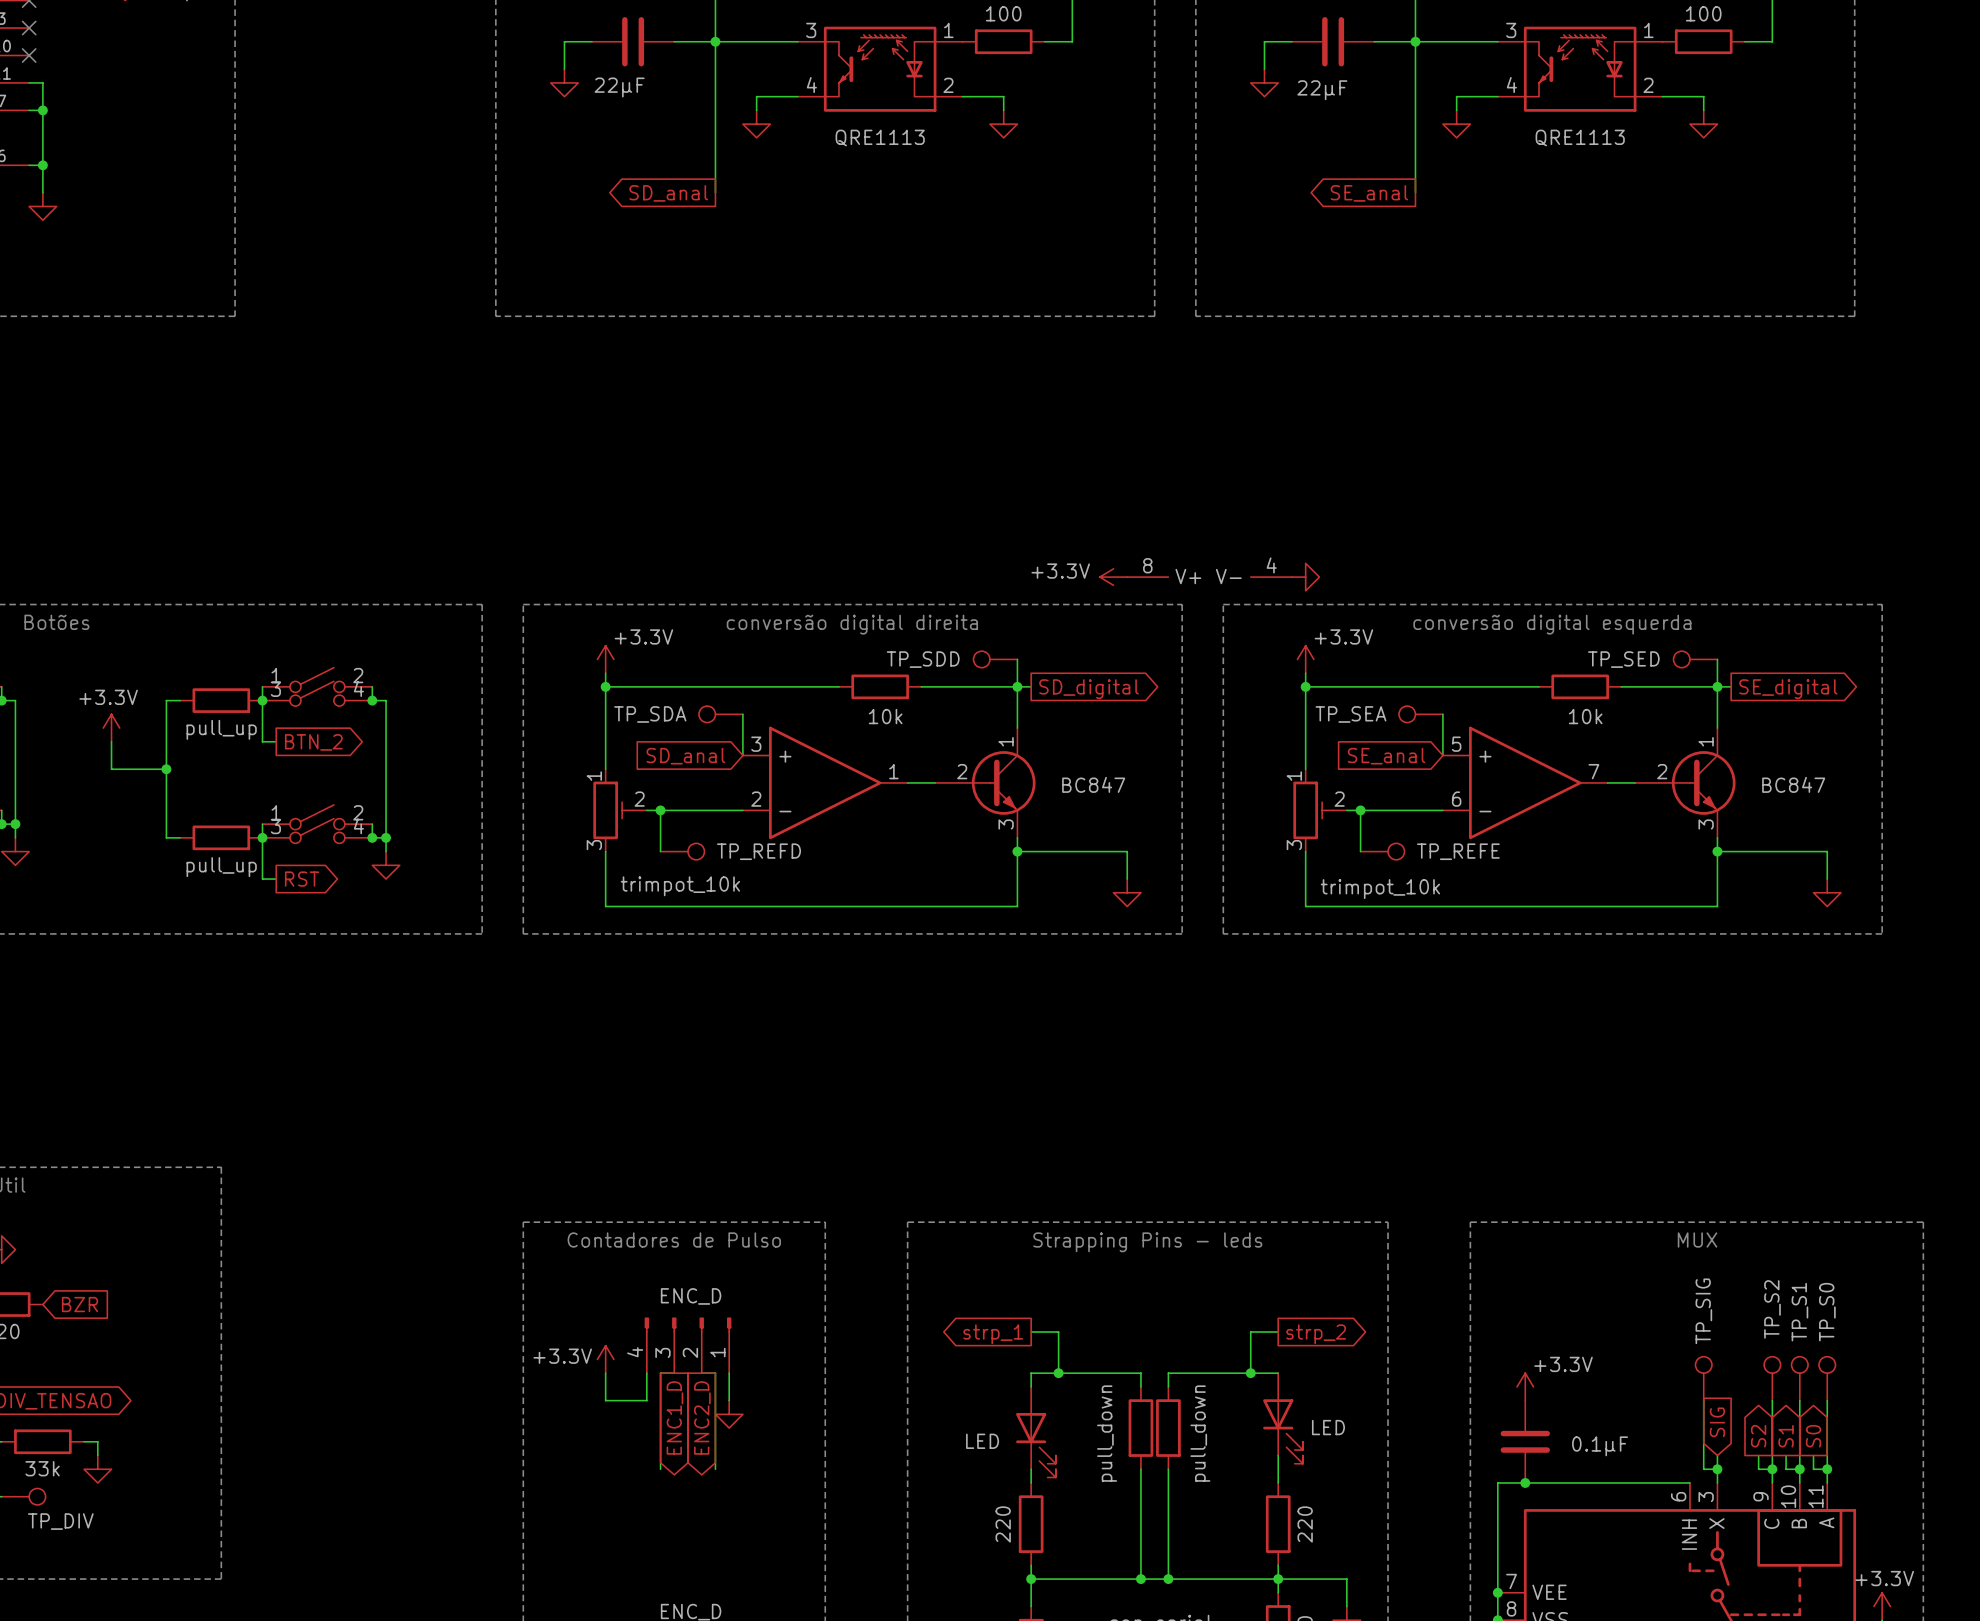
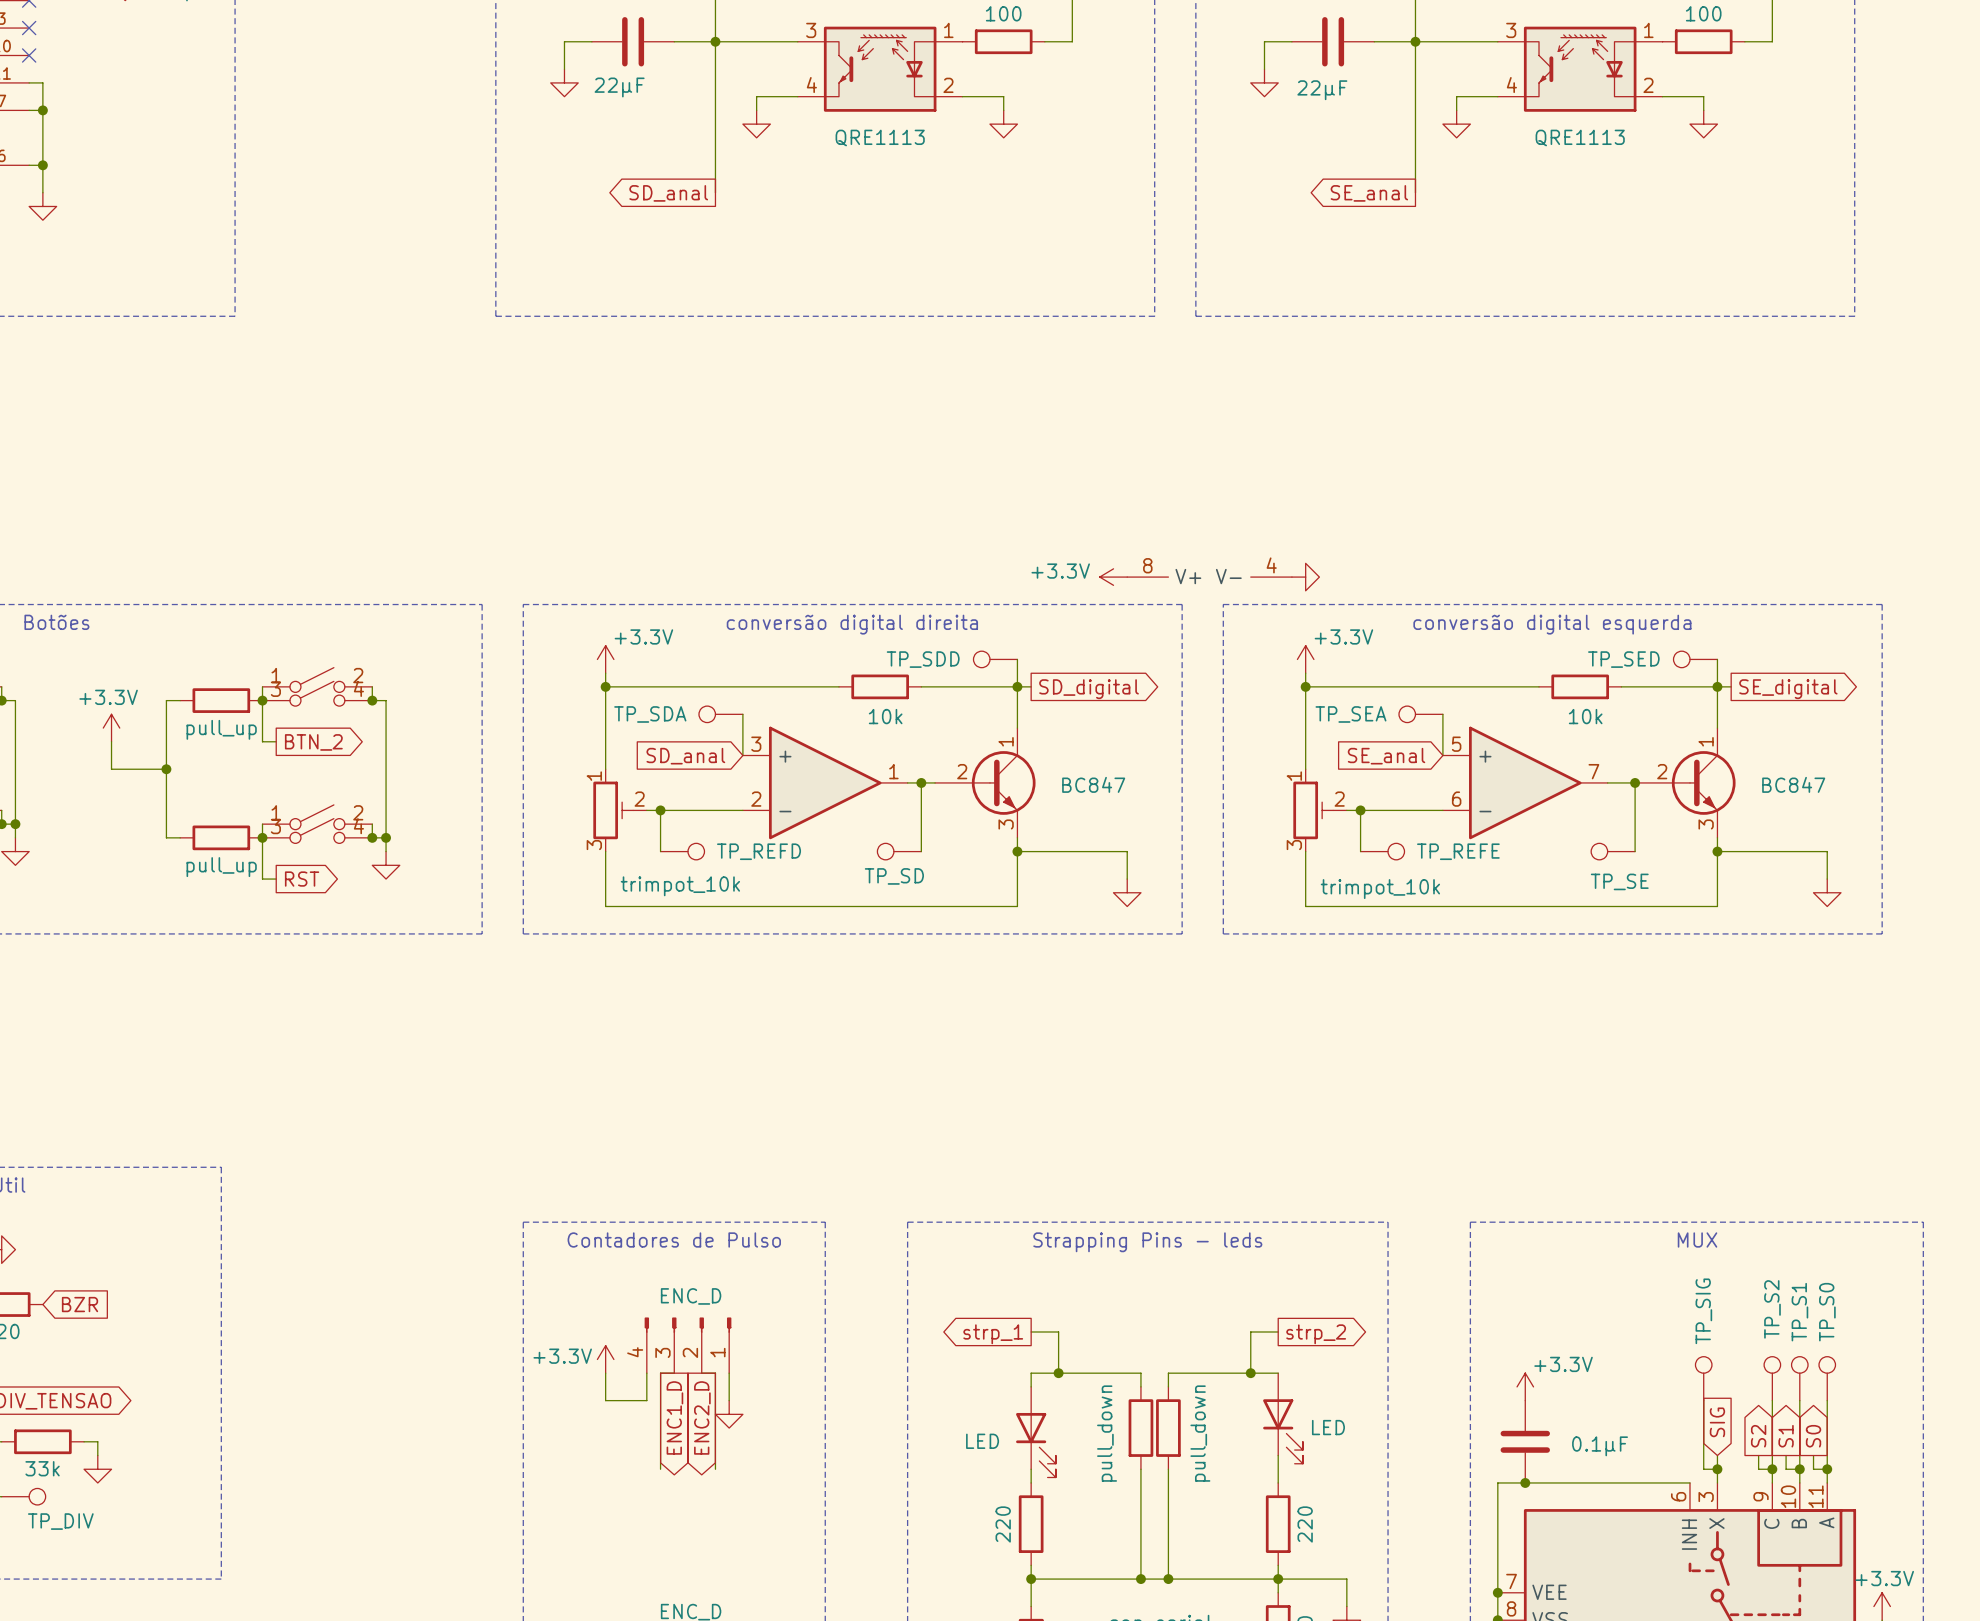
wire: none -> (921, 782) (921, 851)
junction: none -> (921, 782)
wire: none -> (1635, 782) (1635, 851)
junction: none -> (1635, 782)
part: none -> TP_SD (899, 851)
part: none -> TP_SE (1613, 851)

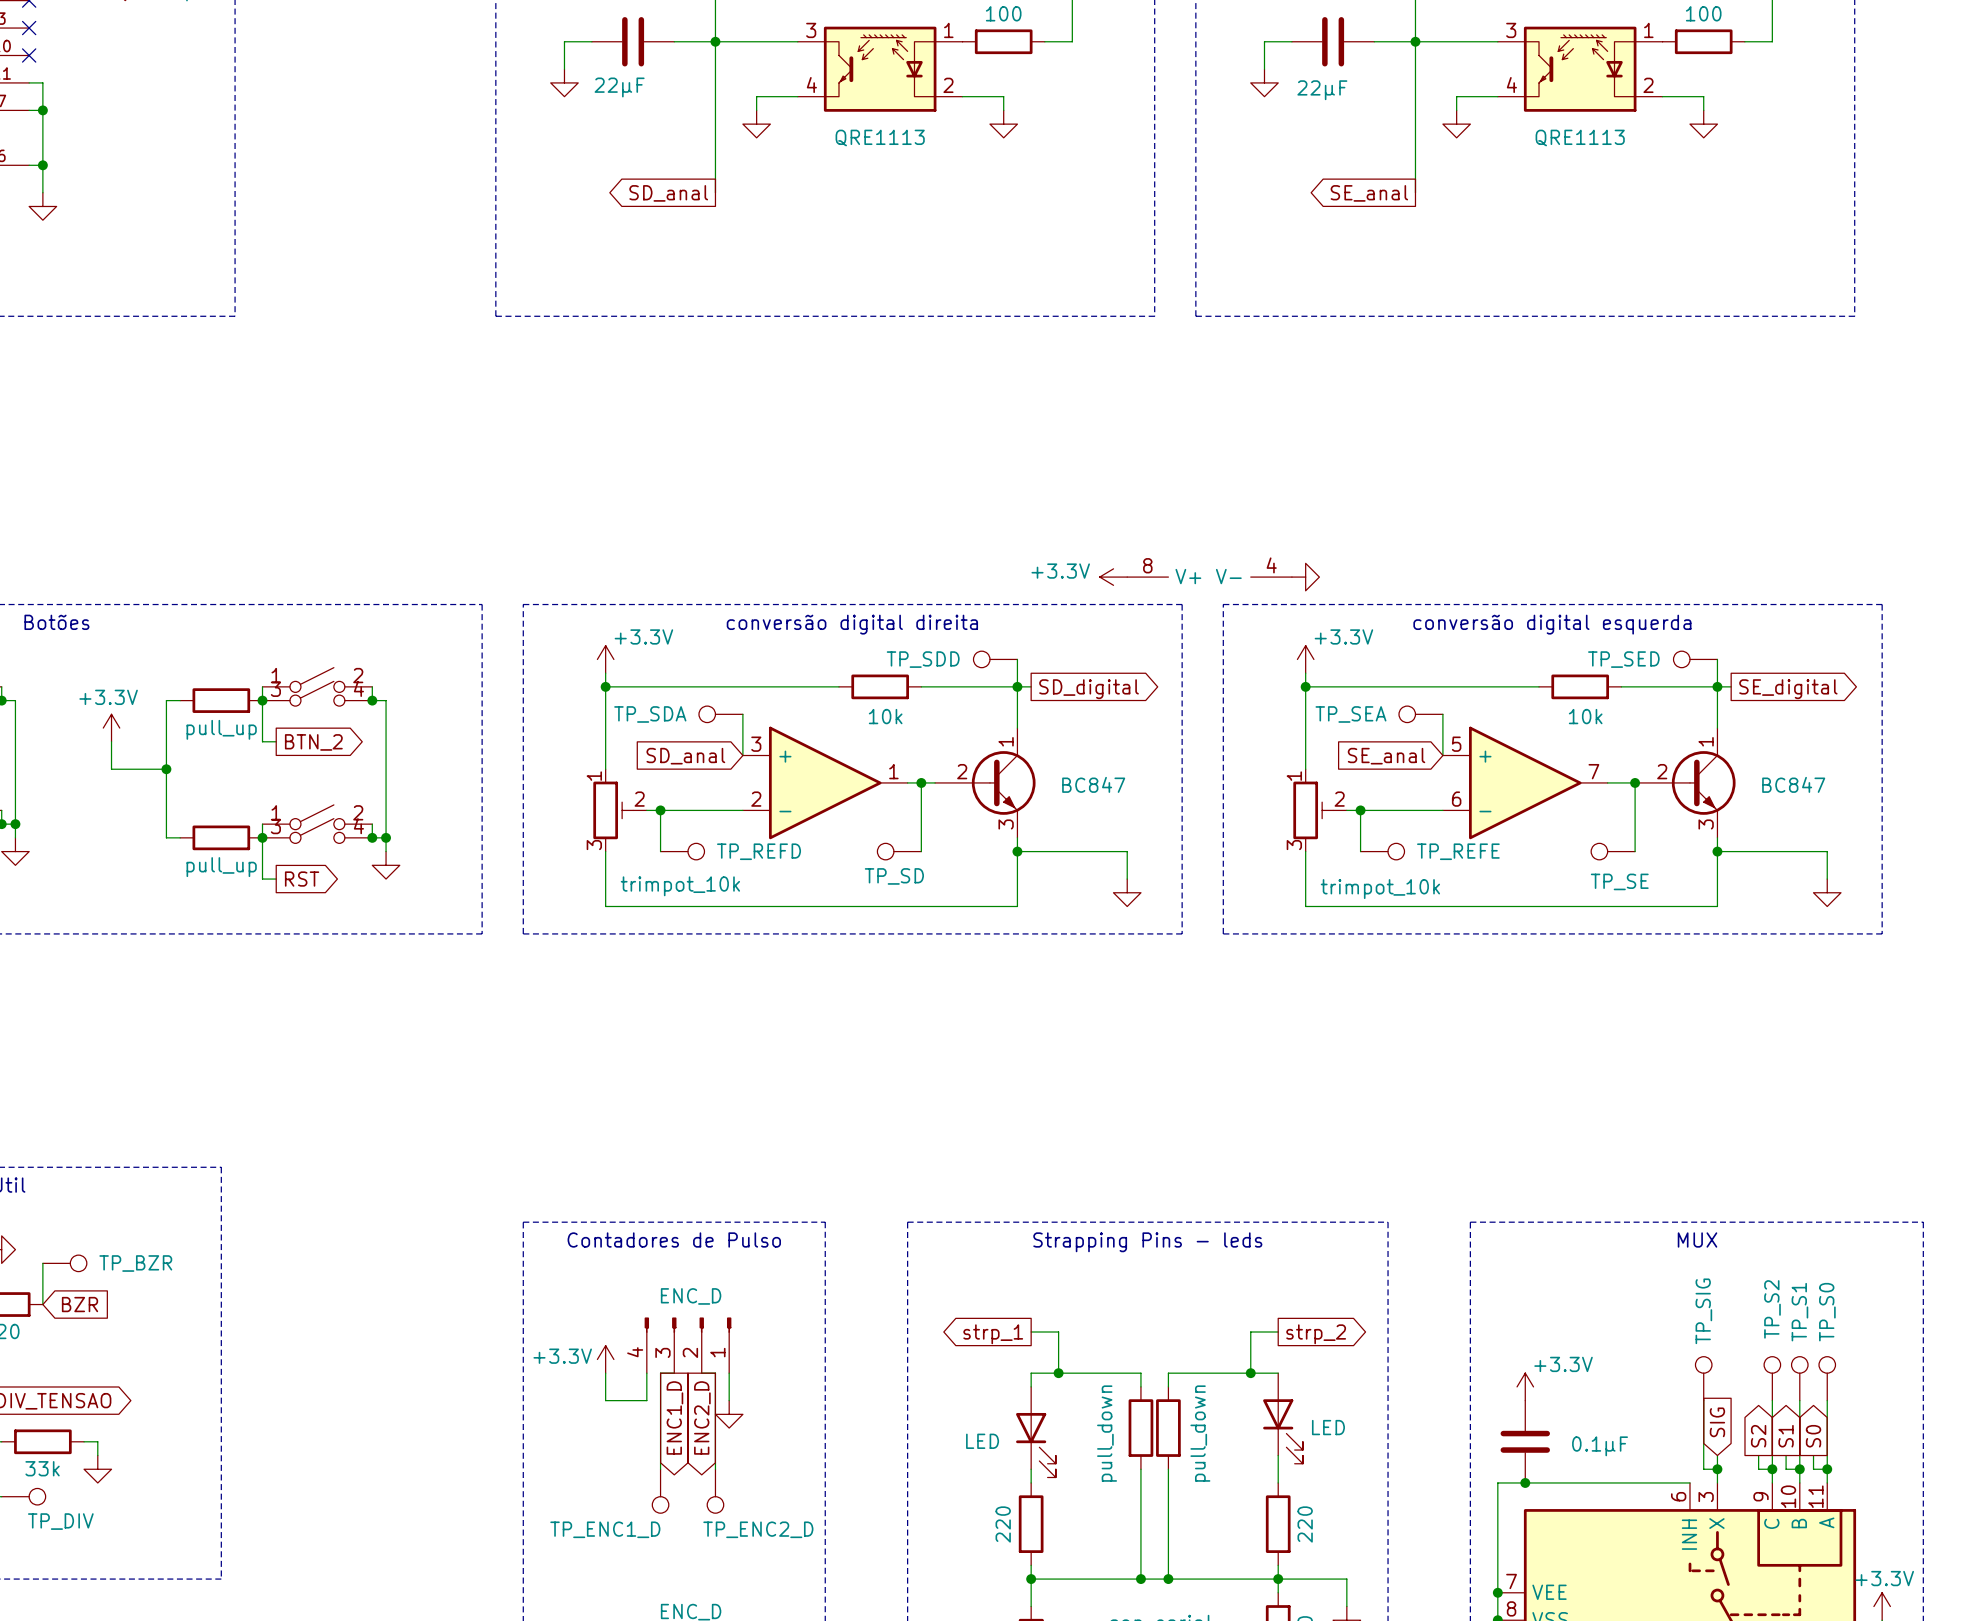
wire: none -> (42, 1263) (42, 1304)
part: none -> TP_BZR (64, 1263)
part: none -> TP_ENC1_D (660, 1491)
part: none -> TP_ENC2_D (715, 1491)

